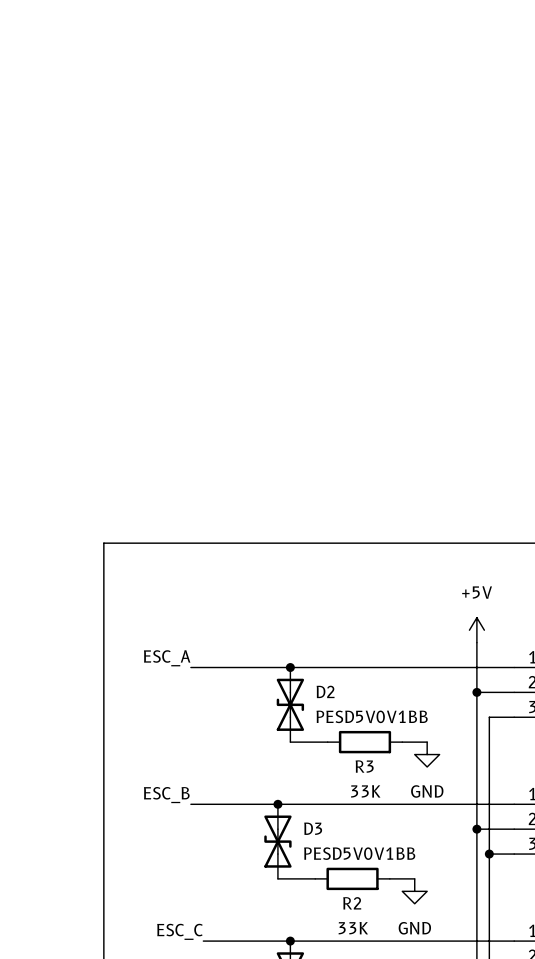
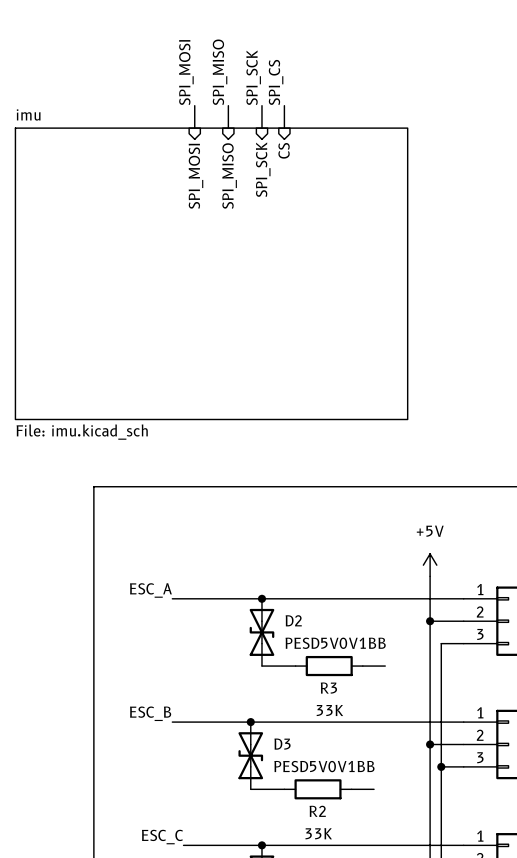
label: none -> SPI_MOSI (186, 72)
label: none -> SPI_MISO (220, 72)
label: none -> SPI_SCK (253, 77)
label: none -> SPI_CS (276, 82)
wire: none -> (194, 105) (194, 128)
wire: none -> (228, 105) (228, 128)
wire: none -> (261, 105) (261, 128)
wire: none -> (284, 105) (284, 128)
sheet pin: none -> CS (284, 150)
sheet pin: none -> SPI_SCK (263, 169)
sheet pin: none -> SPI_MOSI (196, 176)
sheet pin: none -> SPI_MISO (229, 176)
sheet imu: none -> File: imu.kicad_sch (211, 273)
power symbol: GND (427, 754) -> none
power symbol: GND (414, 891) -> none

